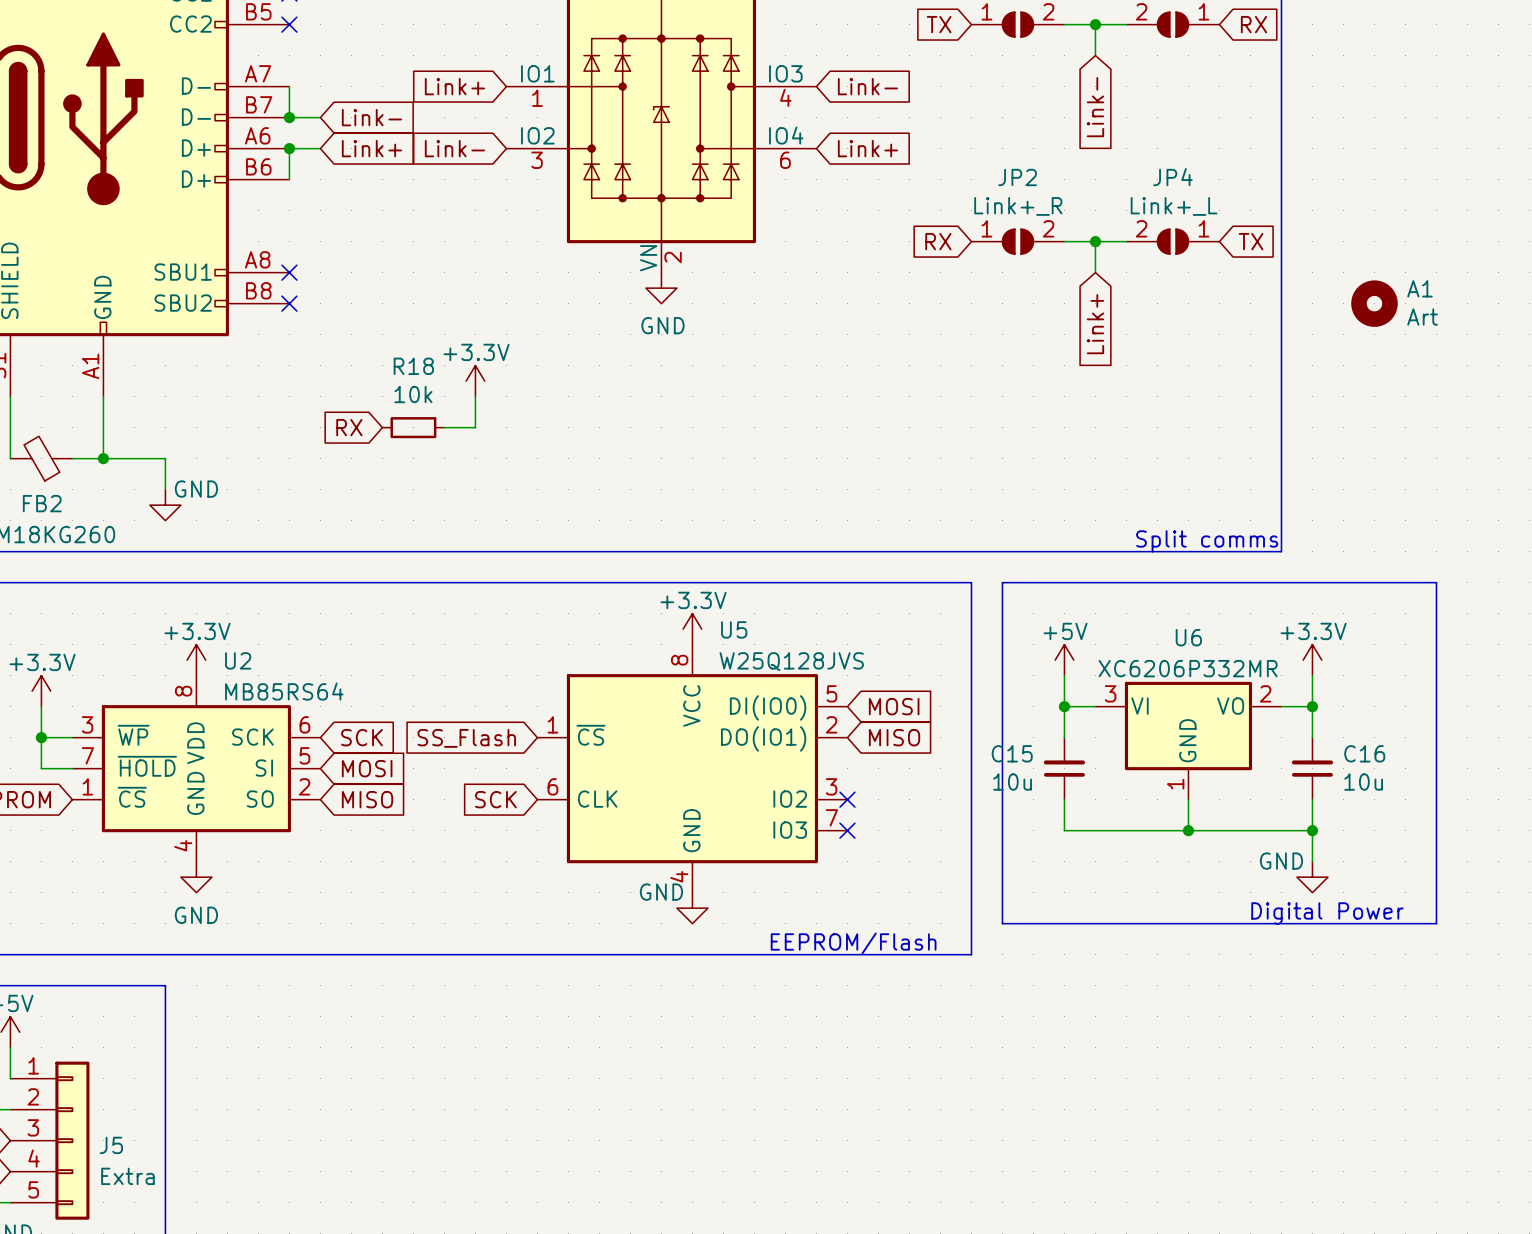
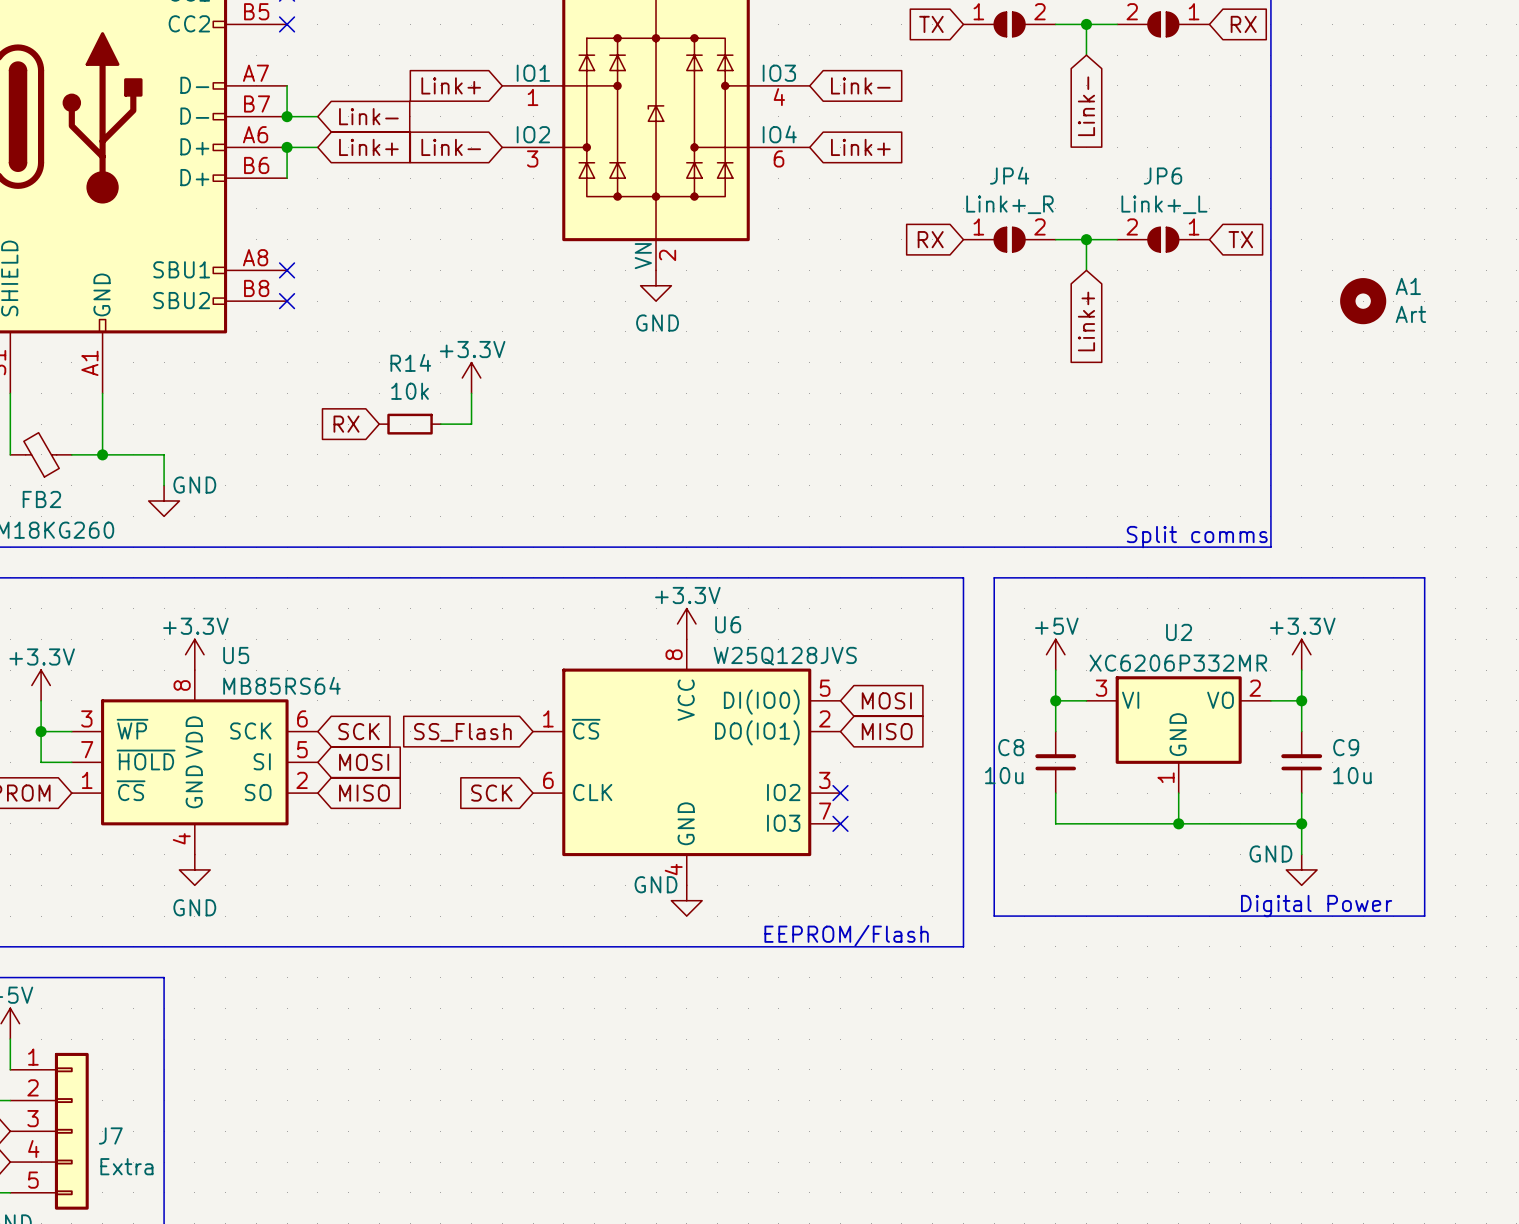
JP2 name: JP2 (1017, 177) -> JP4 (1009, 175)
JP4 name: JP4 (1172, 177) -> JP6 (1162, 176)
R18 name: R18 (413, 366) -> R14 (410, 362)
U5 name: U5 (734, 629) -> U6 (728, 624)
U6 name: U6 (1188, 637) -> U2 (1179, 632)
U2 name: U2 (238, 660) -> U5 (236, 655)
C15 name: C15 (1012, 753) -> C8 (1011, 747)
C16 name: C16 (1364, 753) -> C9 (1346, 747)
J5 name: J5 (111, 1145) -> J7 (110, 1135)

